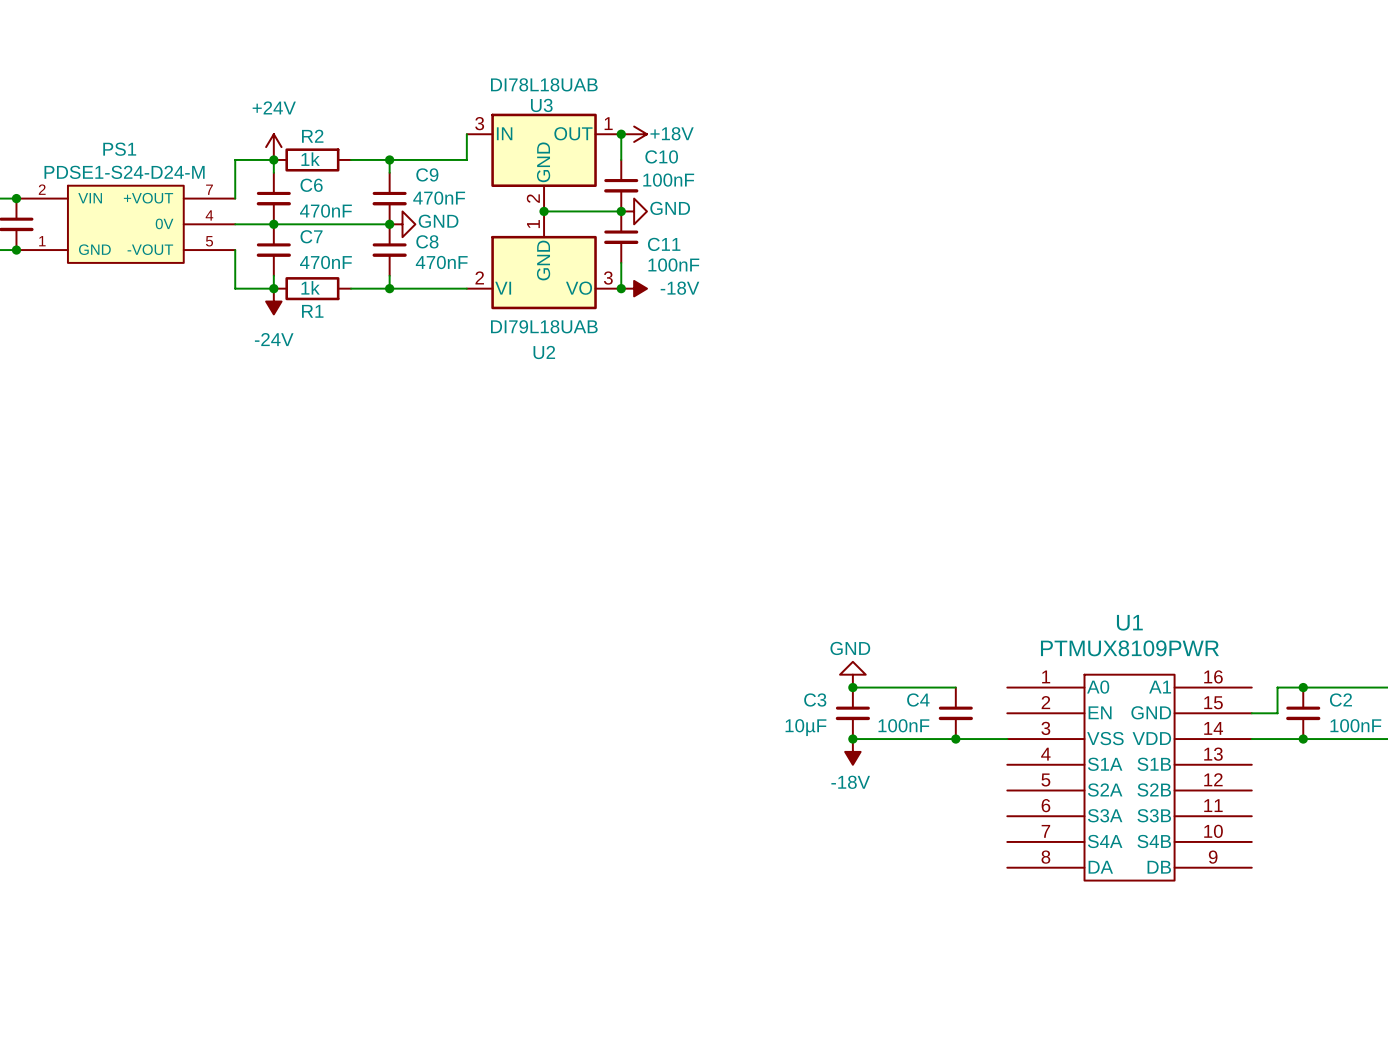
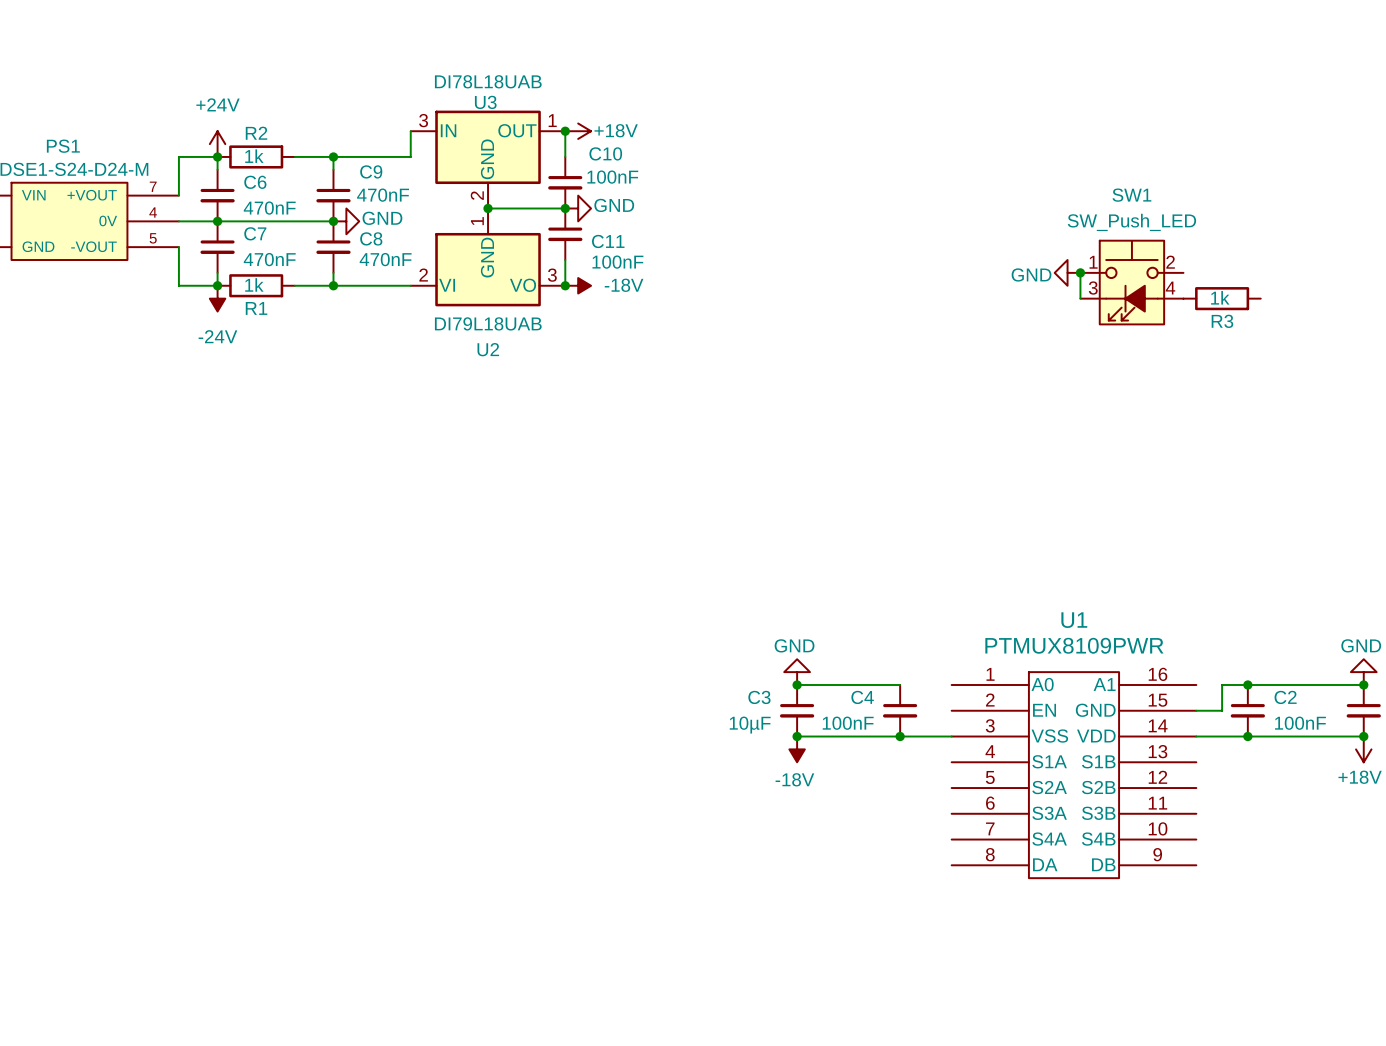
power symbol: none -> GND (1067, 272)
wire: none -> (1080, 272) (1080, 298)
junction: none -> (1080, 272)
SW1: none -> SW_Push_LED (1131, 282)
R3: none -> 1k (1222, 298)

